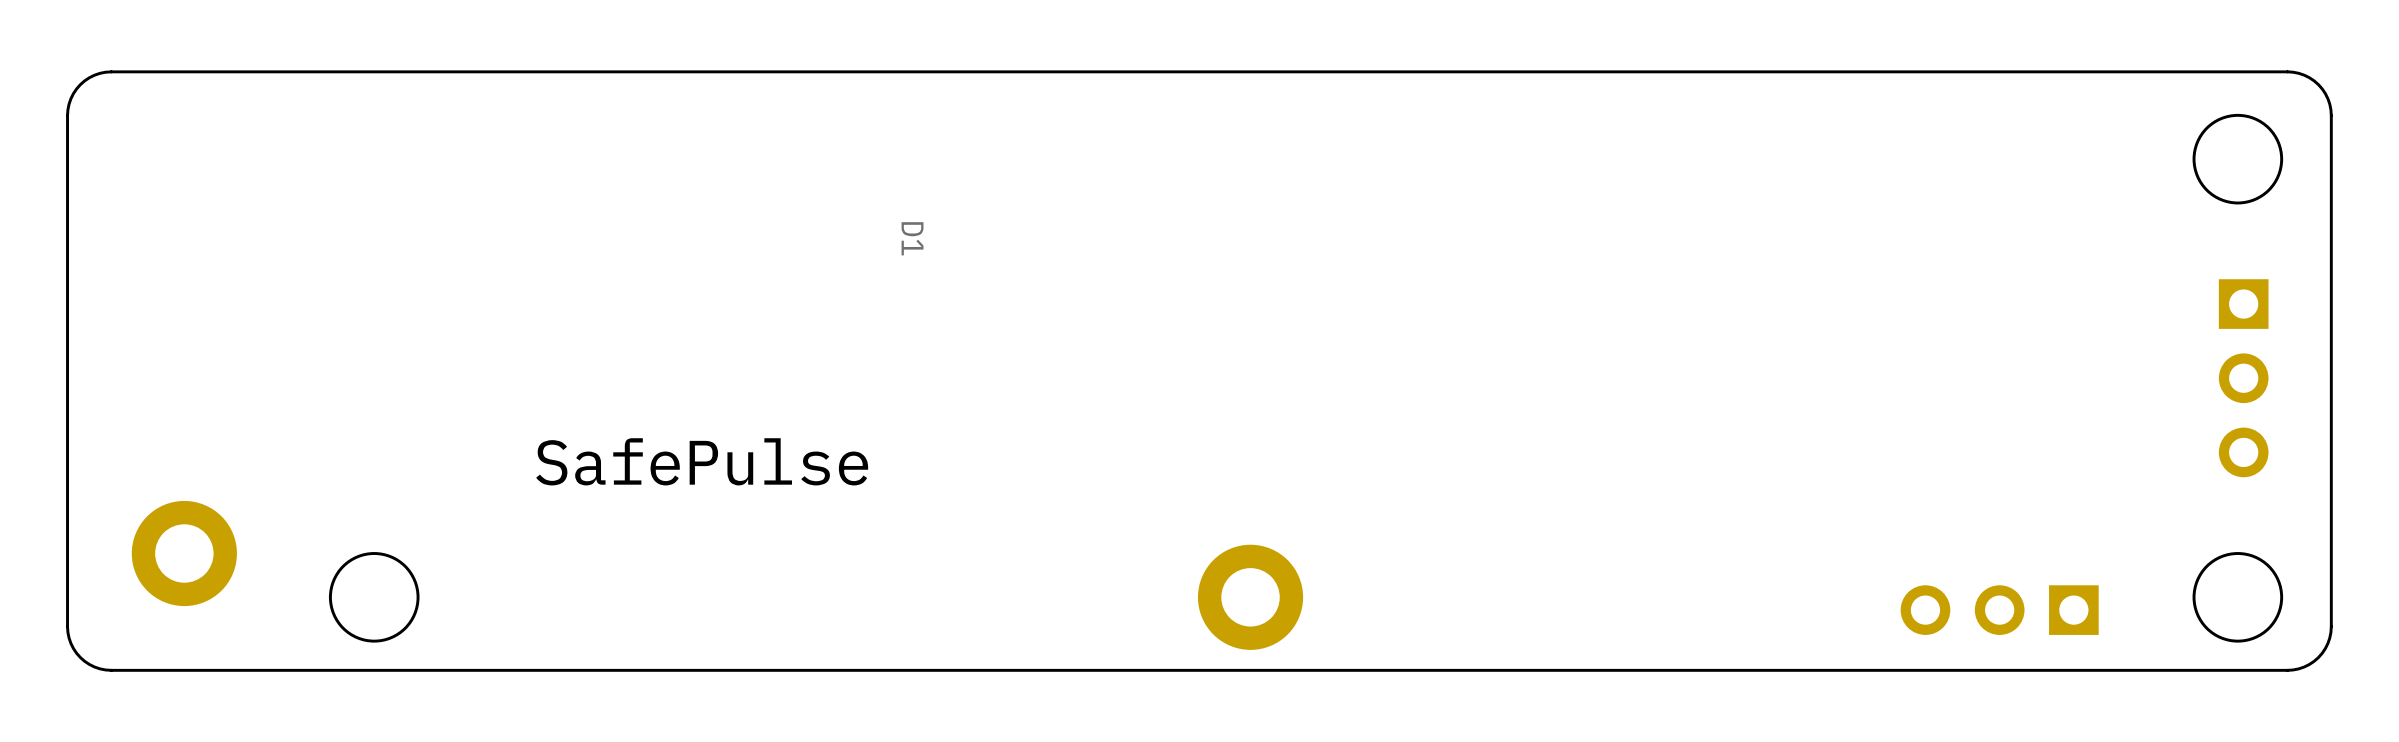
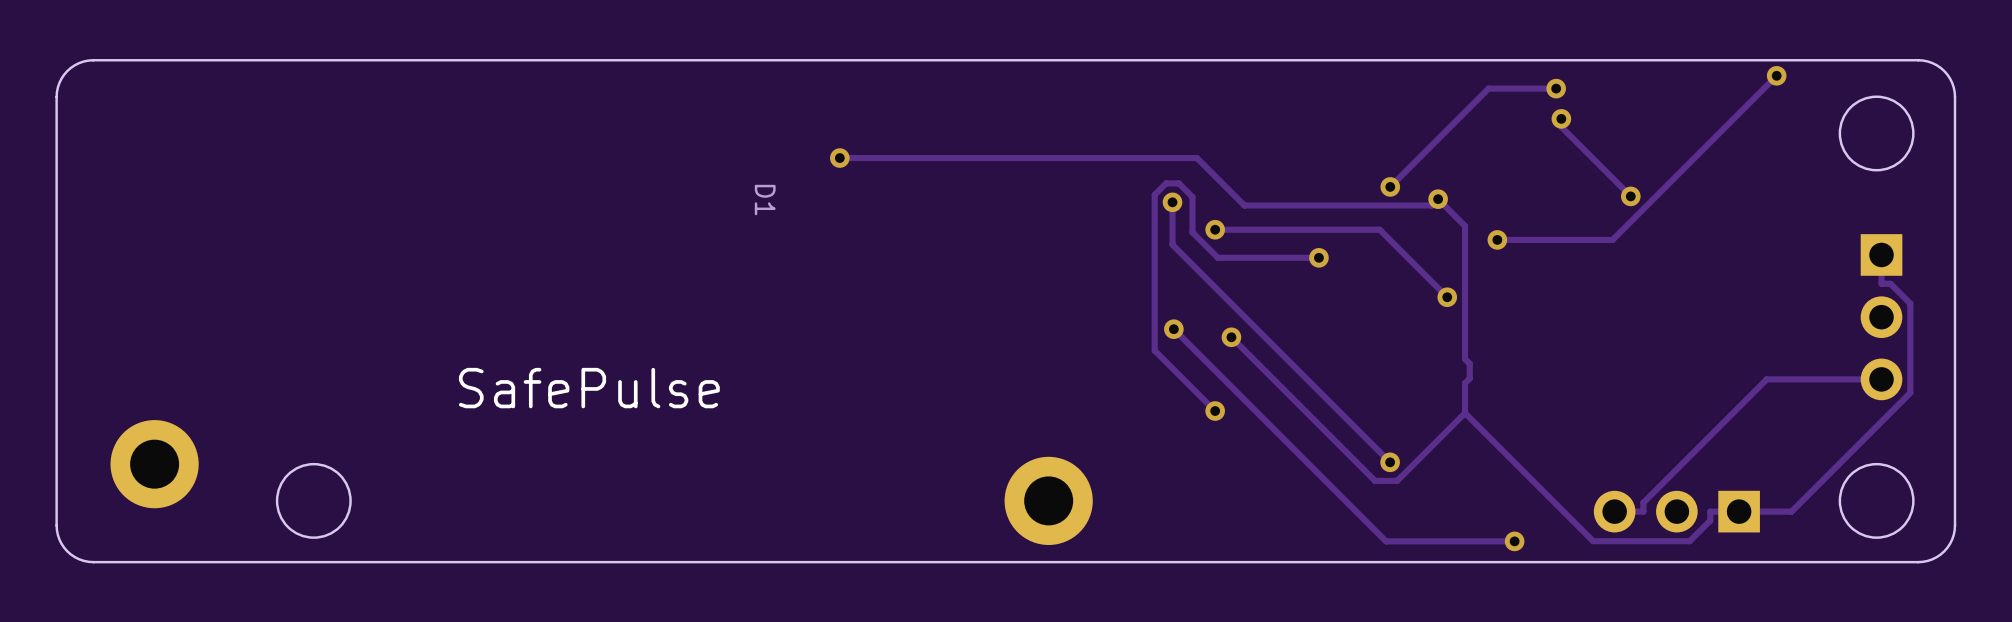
track: none -> (1776, 75) (1612, 239) (1497, 239)
via: none -> (1776, 75)
track: none -> (1556, 88) (1488, 88) (1390, 186)
via: none -> (1556, 88)
track: none -> (1561, 118) (1561, 126) (1630, 196)
via: none -> (1561, 118)
track: none -> (839, 158) (1196, 158) (1244, 205) (1431, 205) (1438, 199) (1465, 226) (1465, 359) (1469, 363) (1469, 378) (1465, 383) (1465, 413)
via: none -> (839, 158)
via: none -> (1390, 186)
via: none -> (1630, 196)
via: none -> (1438, 199)
track: none -> (1172, 202) (1172, 244) (1390, 462)
via: none -> (1172, 202)
track: none -> (1215, 229) (1379, 229) (1447, 297)
via: none -> (1215, 229)
via: none -> (1497, 239)
track: none -> (1881, 254) (1881, 283) (1890, 283) (1910, 303) (1910, 392) (1791, 511) (1710, 511) (1710, 520) (1689, 541) (1593, 541) (1465, 413)
track: none -> (1318, 257) (1217, 257) (1192, 232) (1192, 196) (1178, 183) (1166, 183) (1154, 194) (1154, 350) (1215, 411)
via: none -> (1318, 257)
via: none -> (1447, 297)
track: none -> (1173, 329) (1386, 541) (1514, 541)
via: none -> (1173, 329)
track: none -> (1231, 337) (1375, 480) (1397, 480) (1465, 413)
via: none -> (1231, 337)
track: none -> (1881, 379) (1766, 379) (1643, 502) (1643, 511) (1614, 511)
via: none -> (1215, 411)
via: none -> (1390, 462)
via: none -> (1514, 541)

